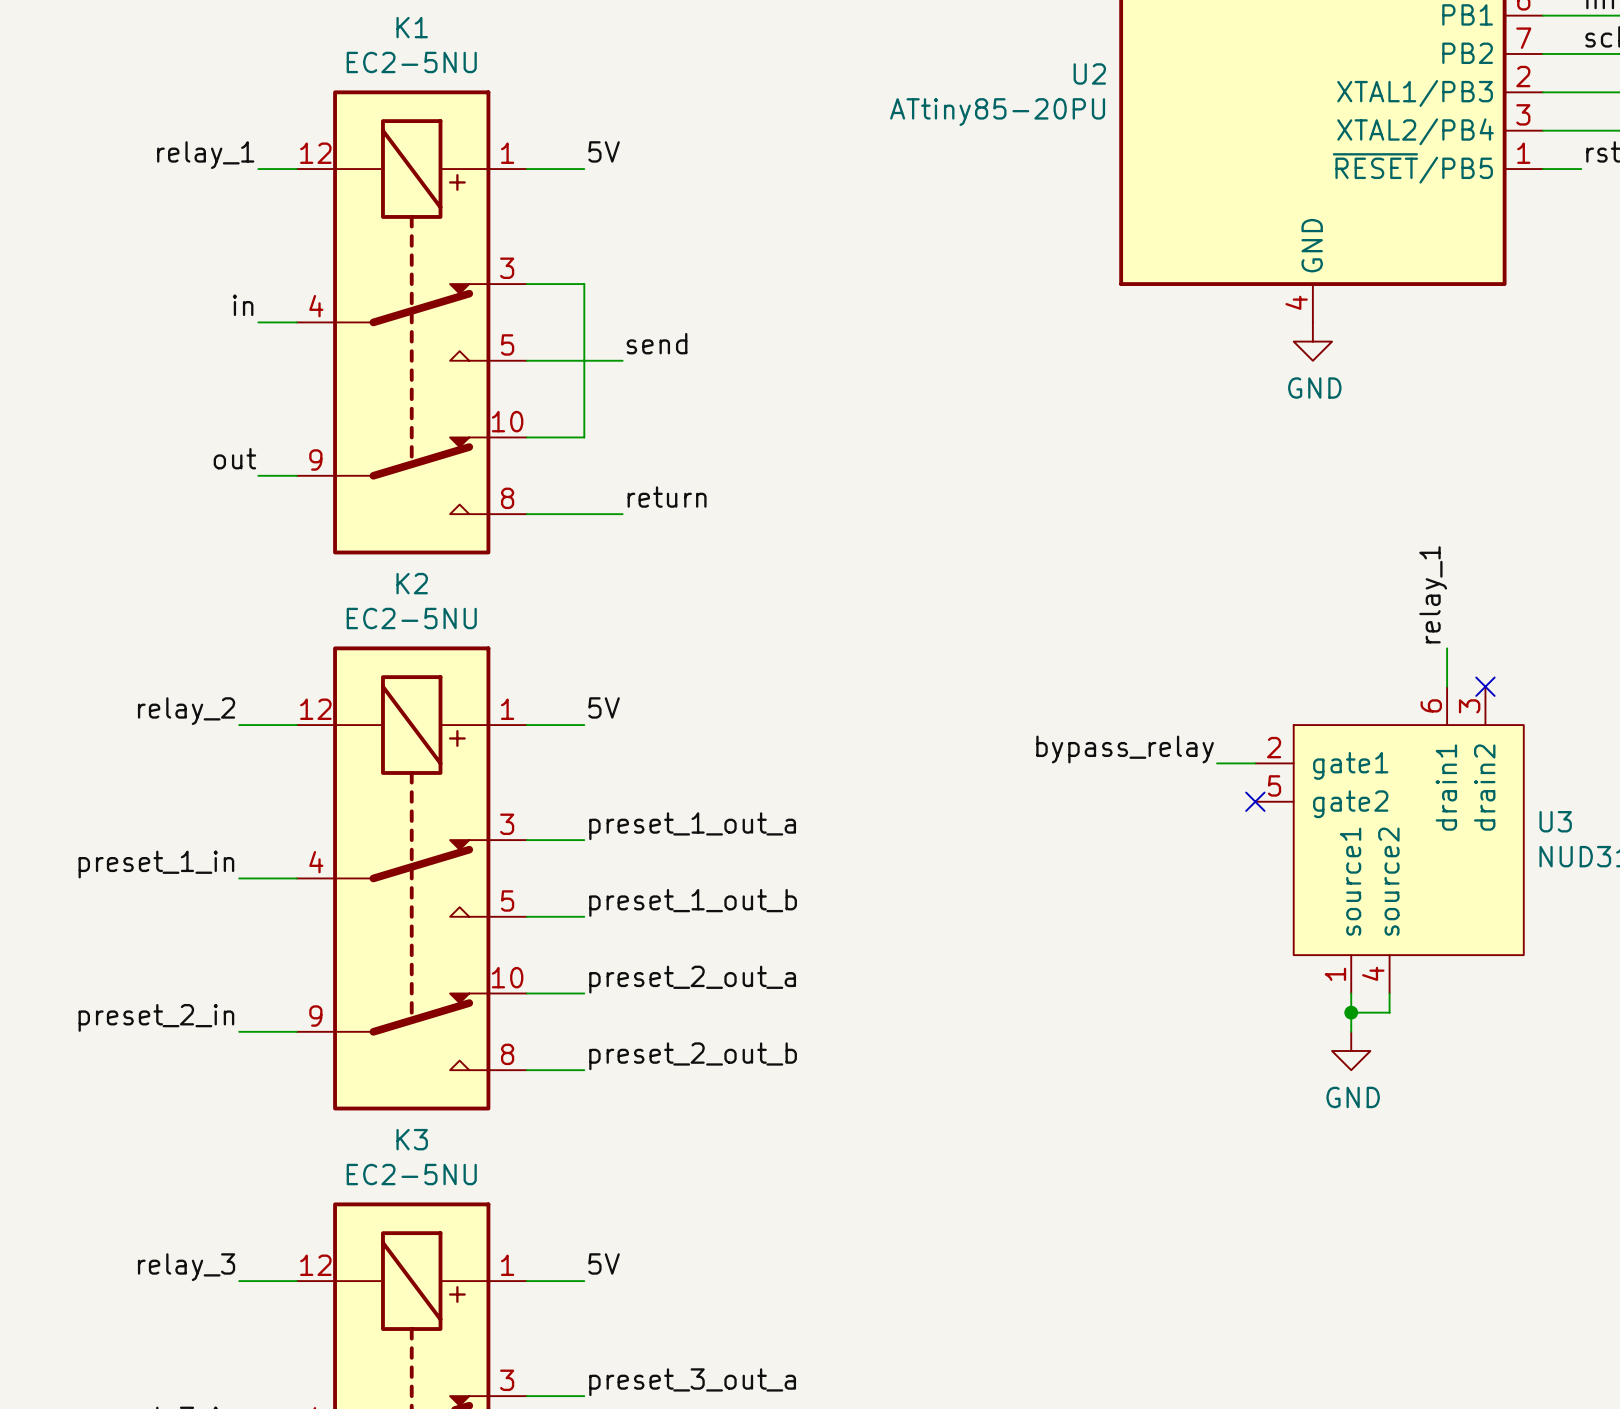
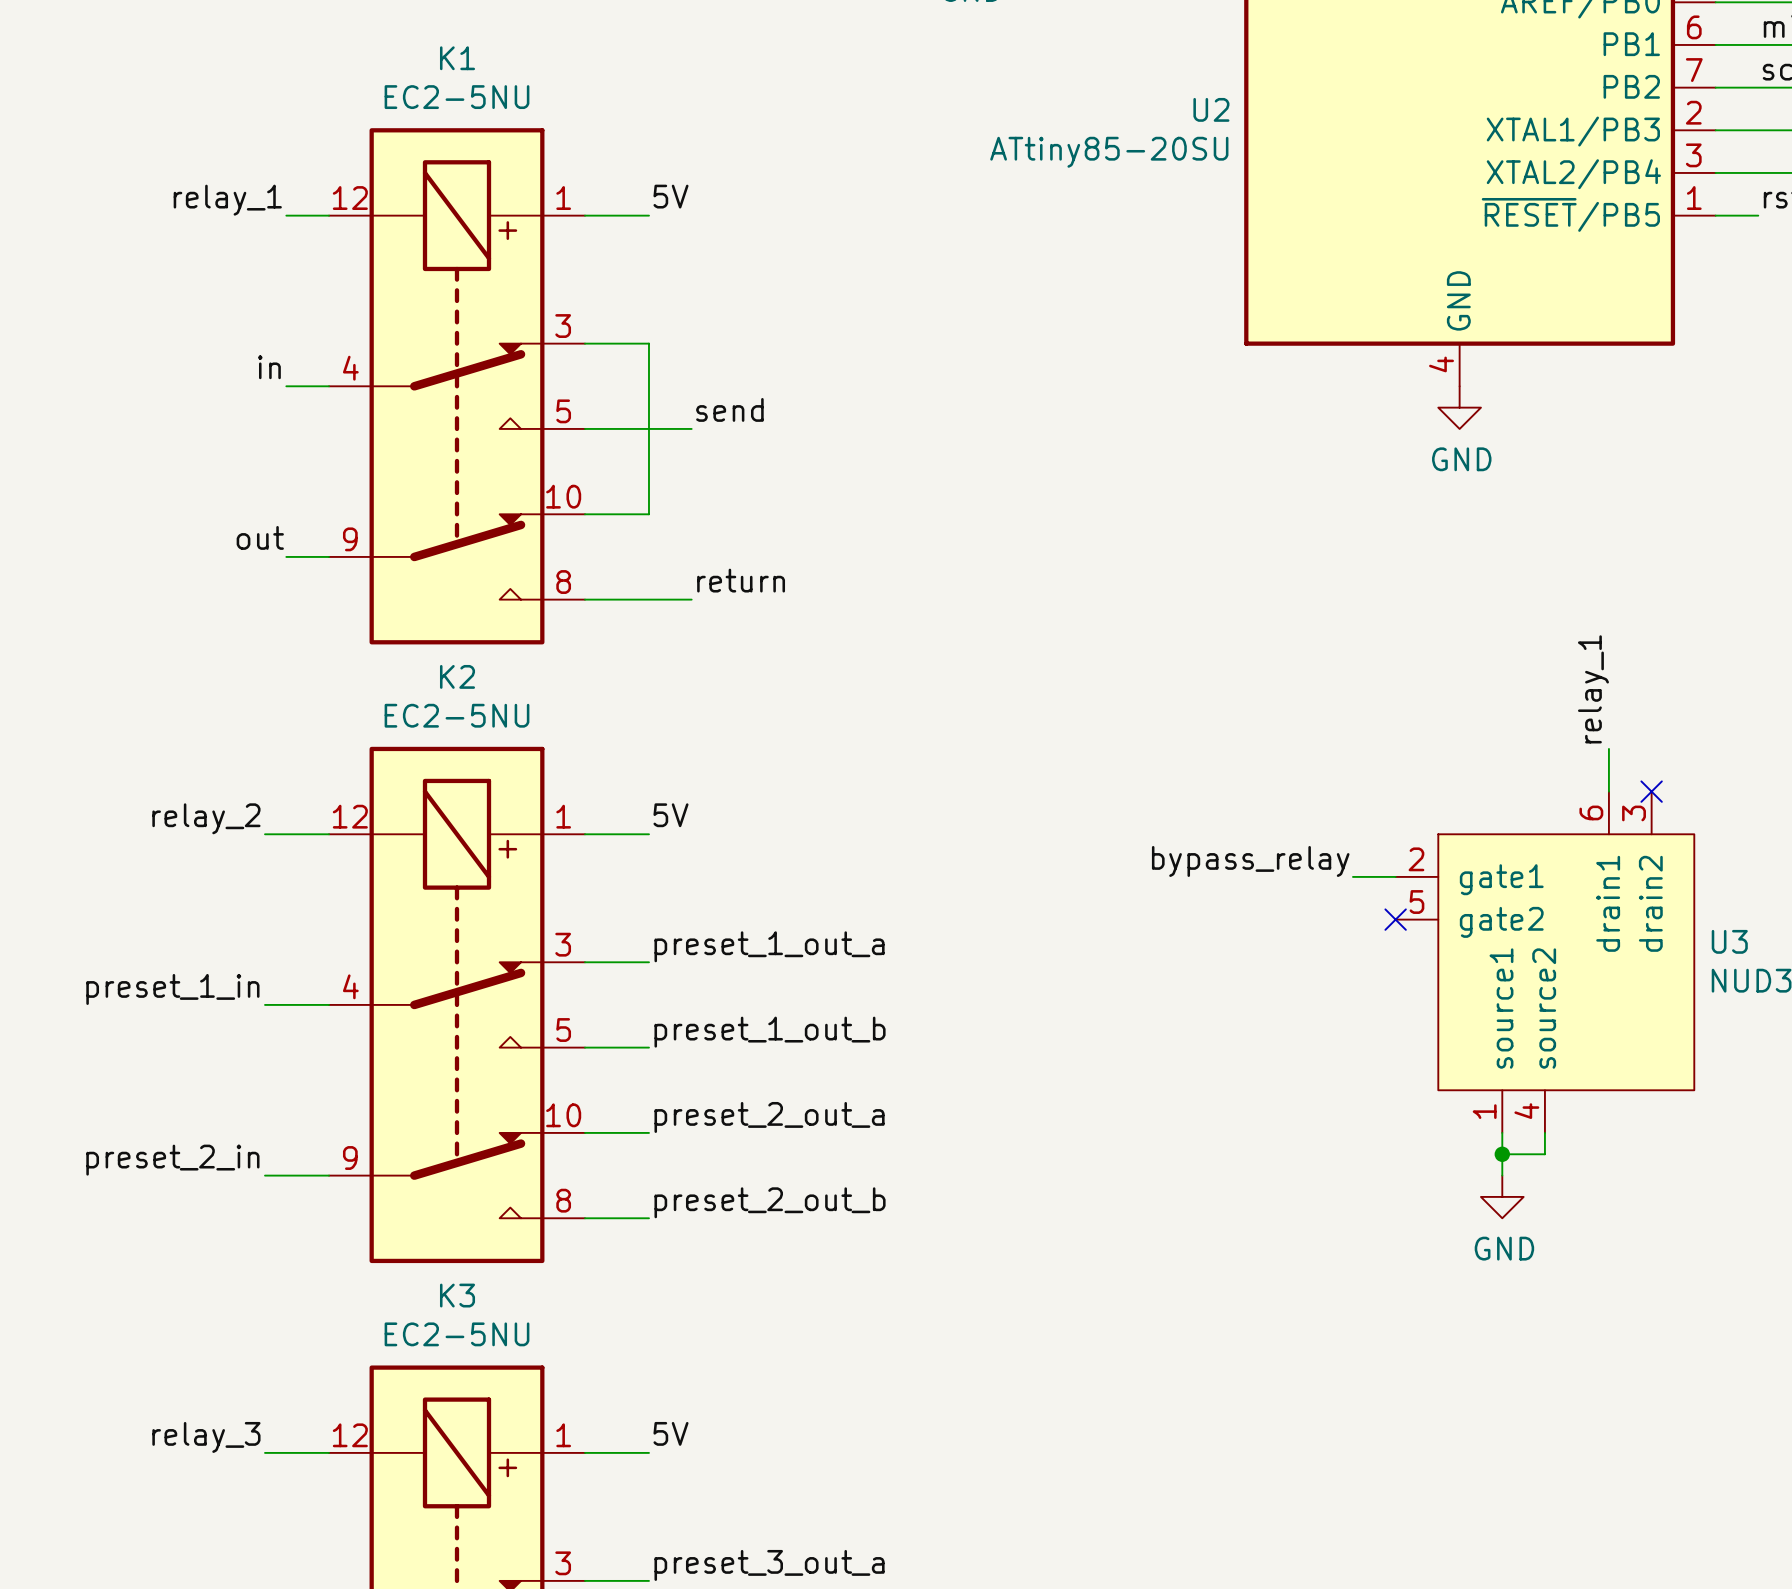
U2 value: ATtiny85-20PU (997, 112) -> ATtiny85-20SU (1109, 152)

